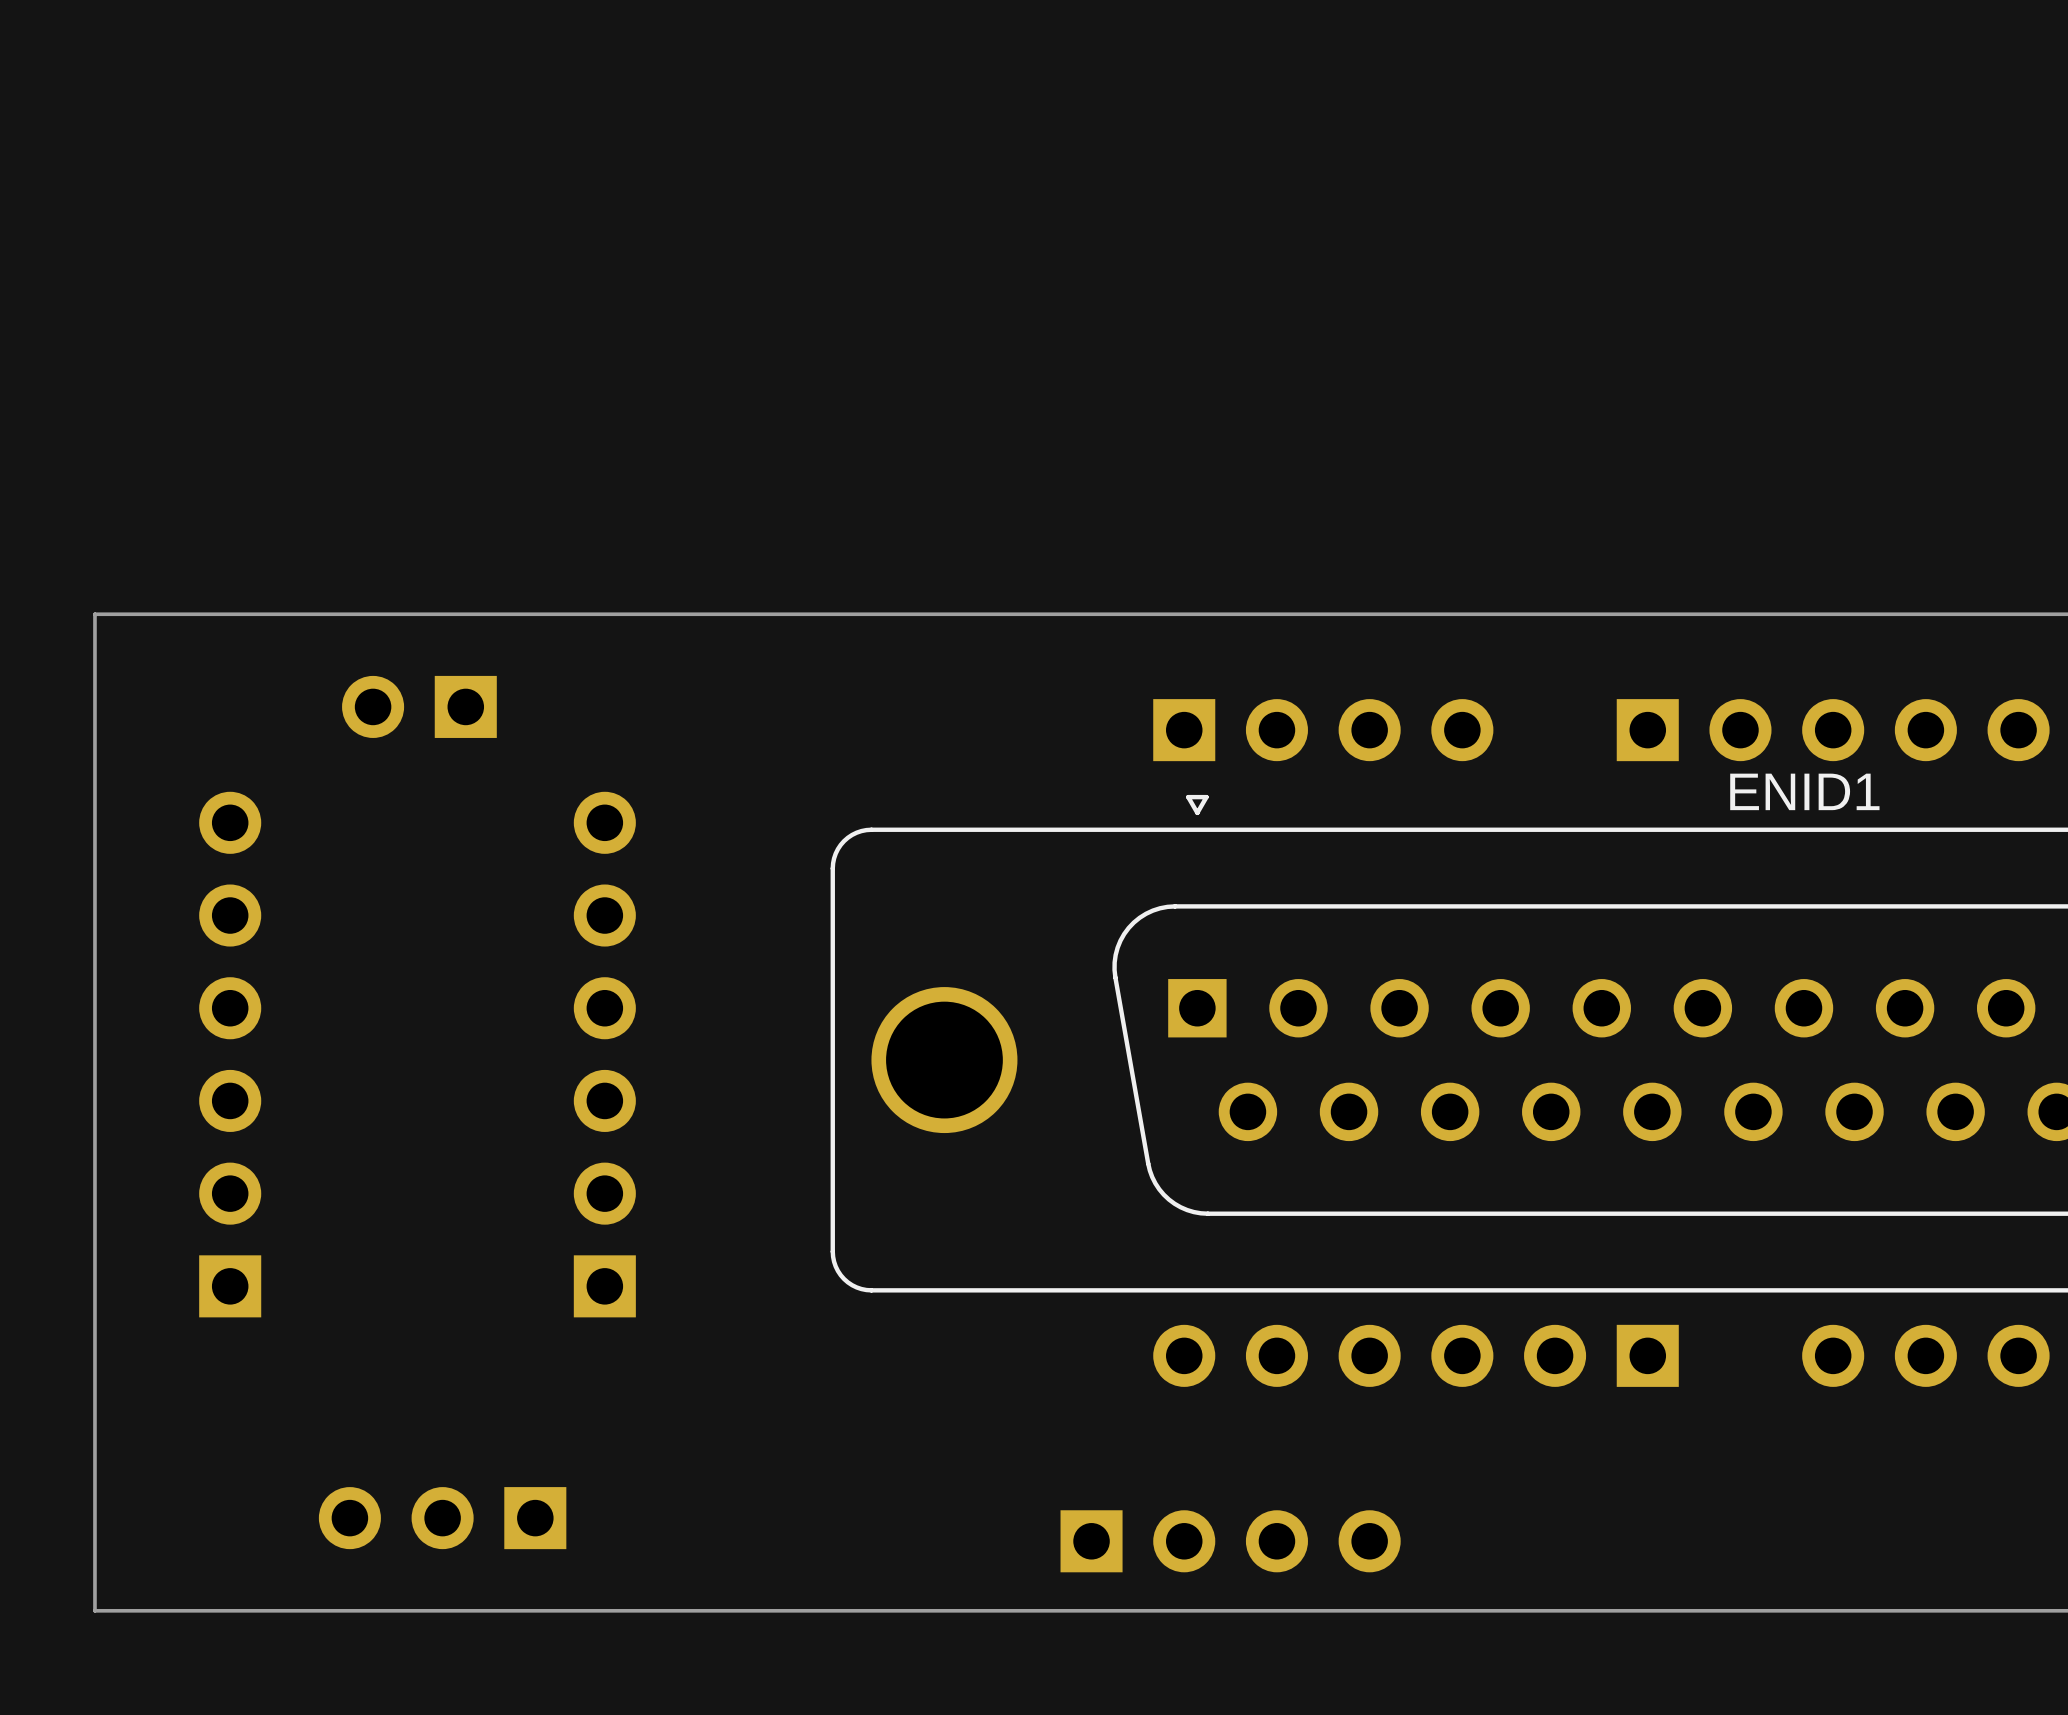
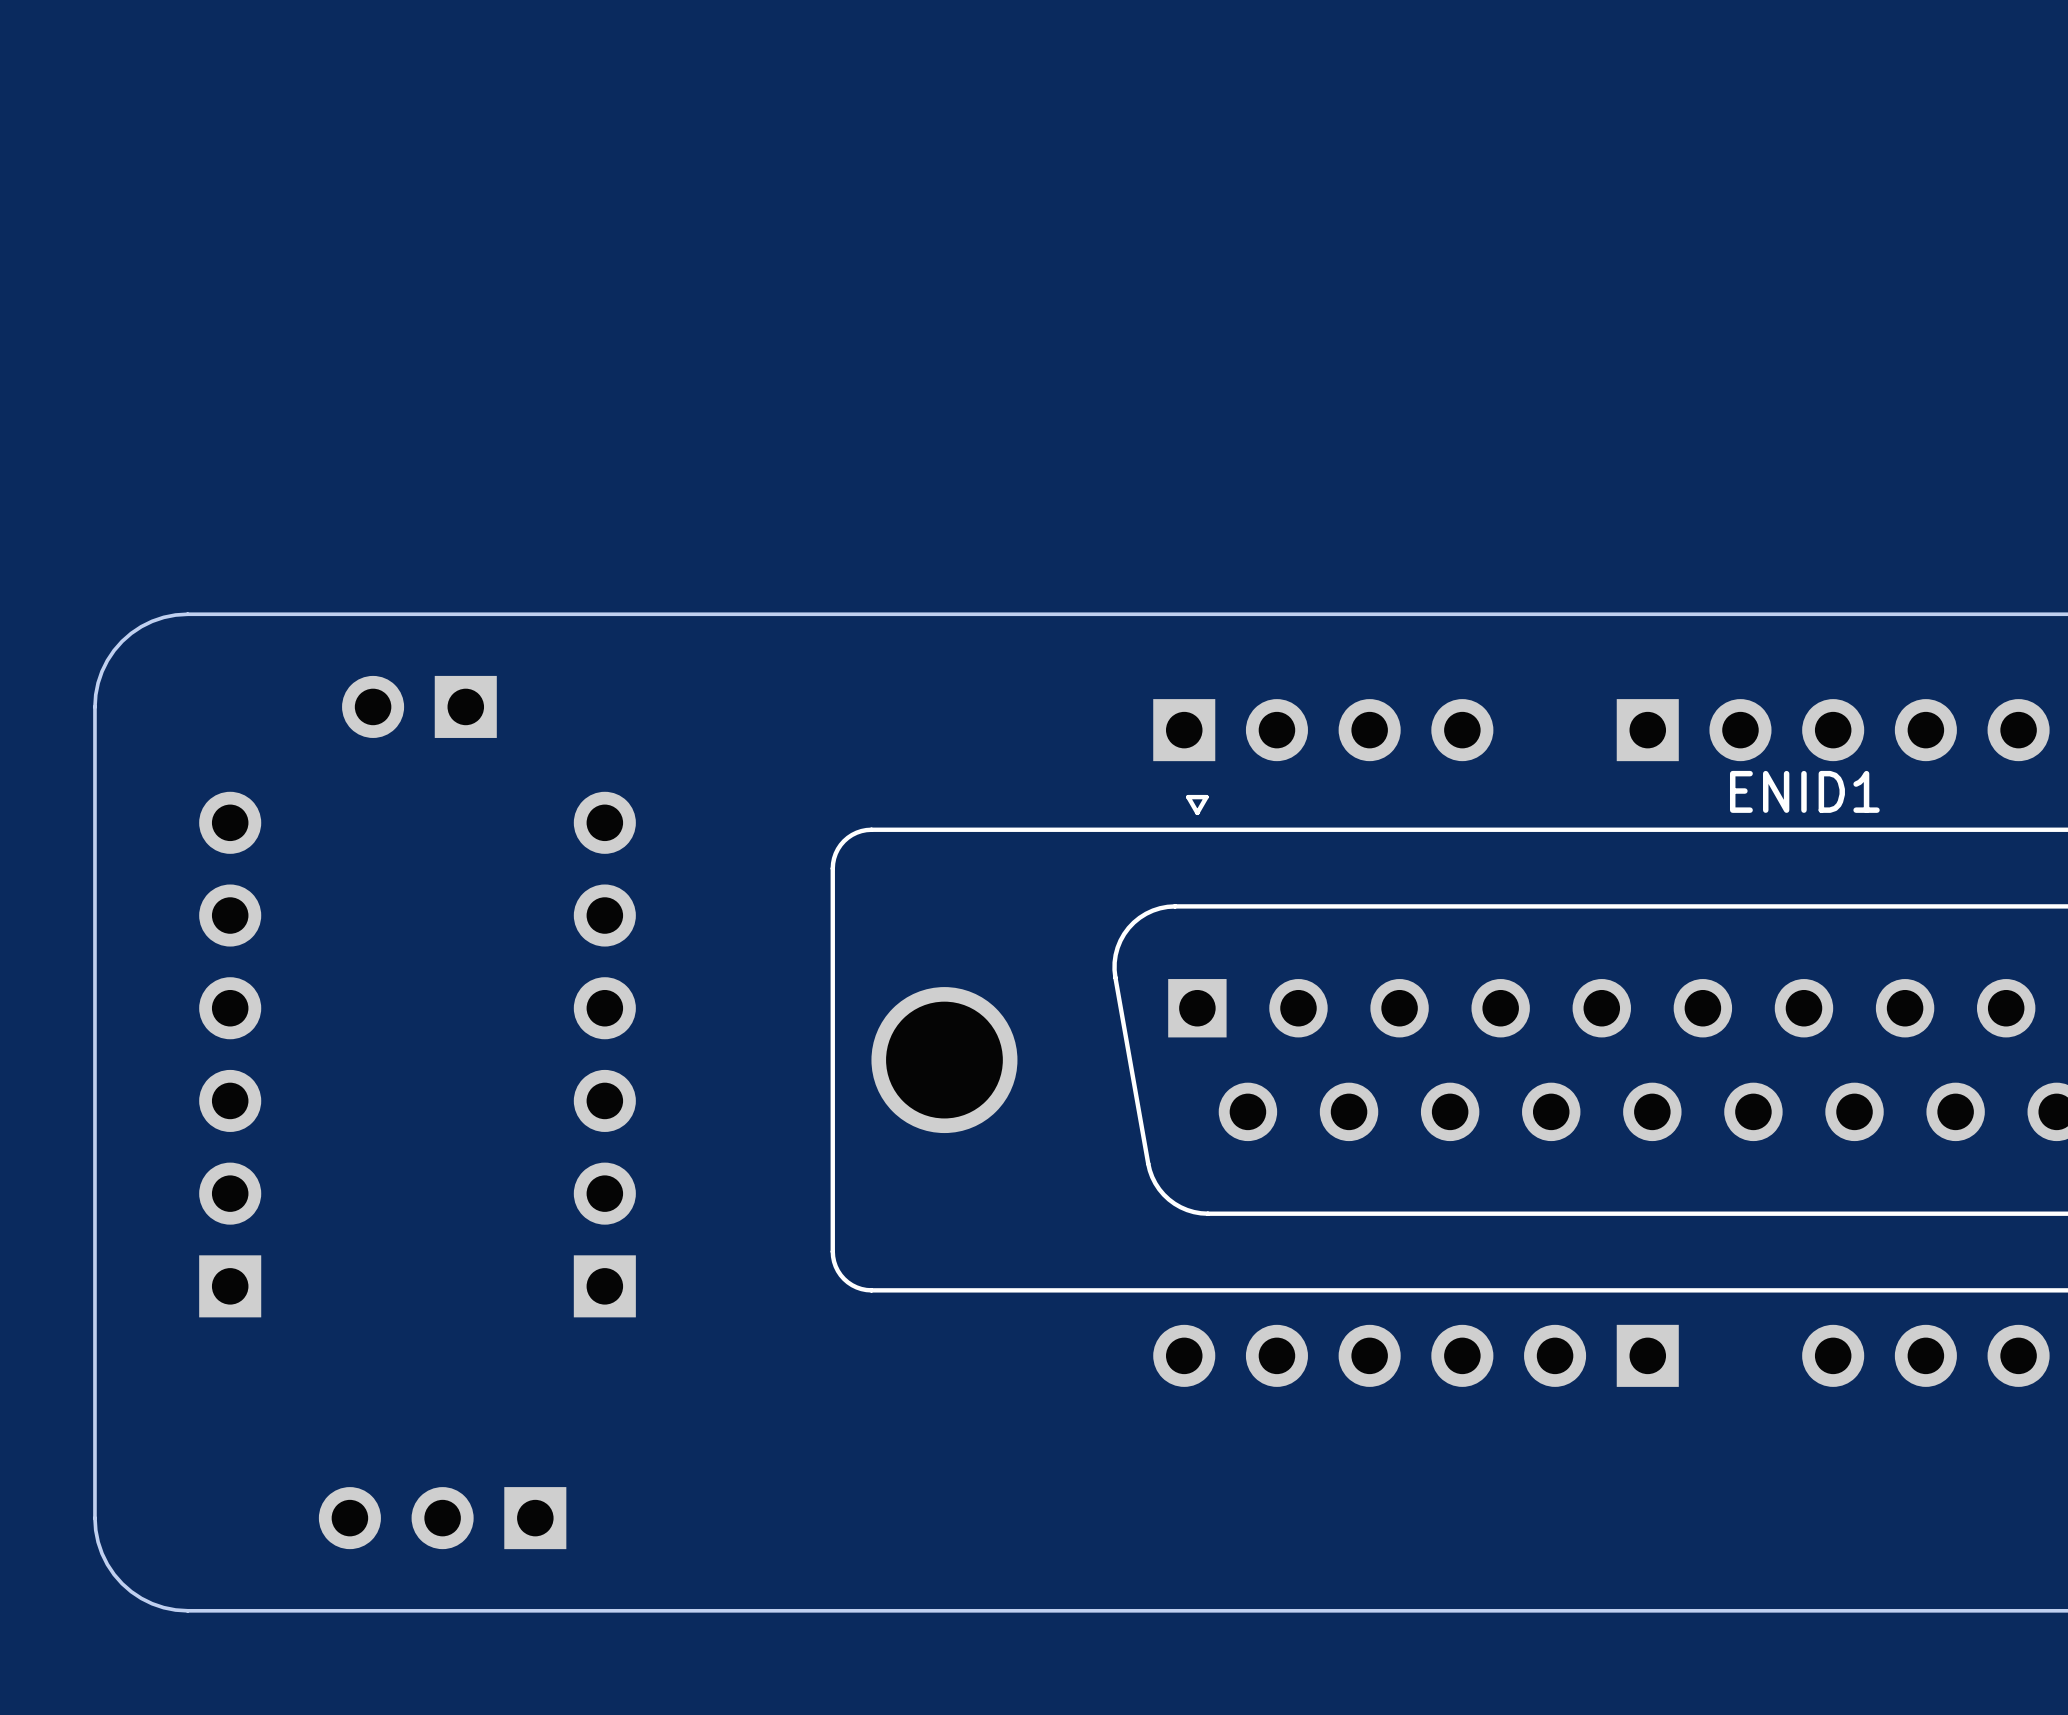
board edge: (187, 614) (94, 614) (94, 706) -> (187, 614) (163, 617) (152, 621) (131, 633) (122, 641) (107, 660) (102, 671) (95, 694) (94, 706)
board edge: (94, 1518) (94, 1610) (187, 1610) -> (94, 1518) (95, 1530) (102, 1553) (107, 1564) (122, 1583) (141, 1598) (152, 1603) (175, 1610) (187, 1610)
part: (1230, 1541) -> none

